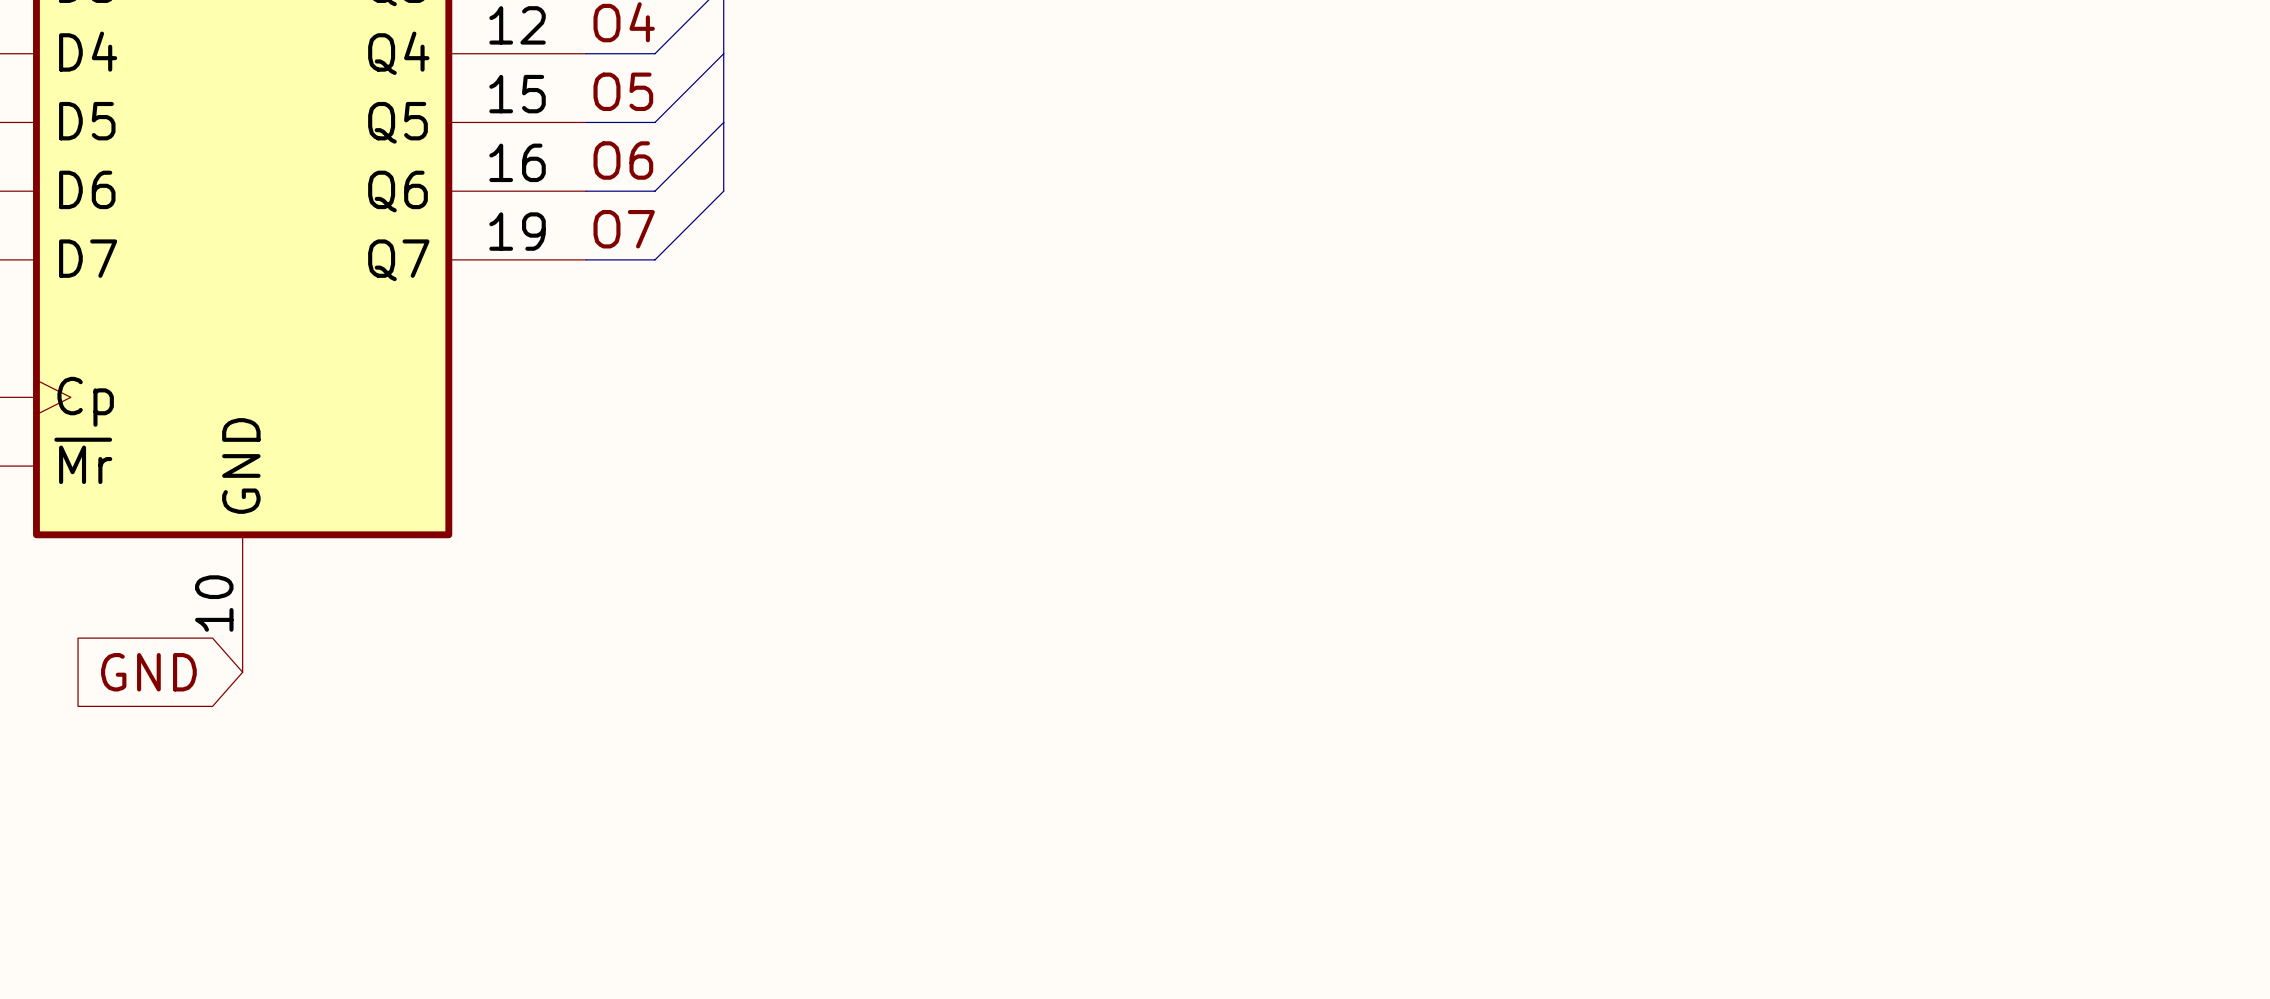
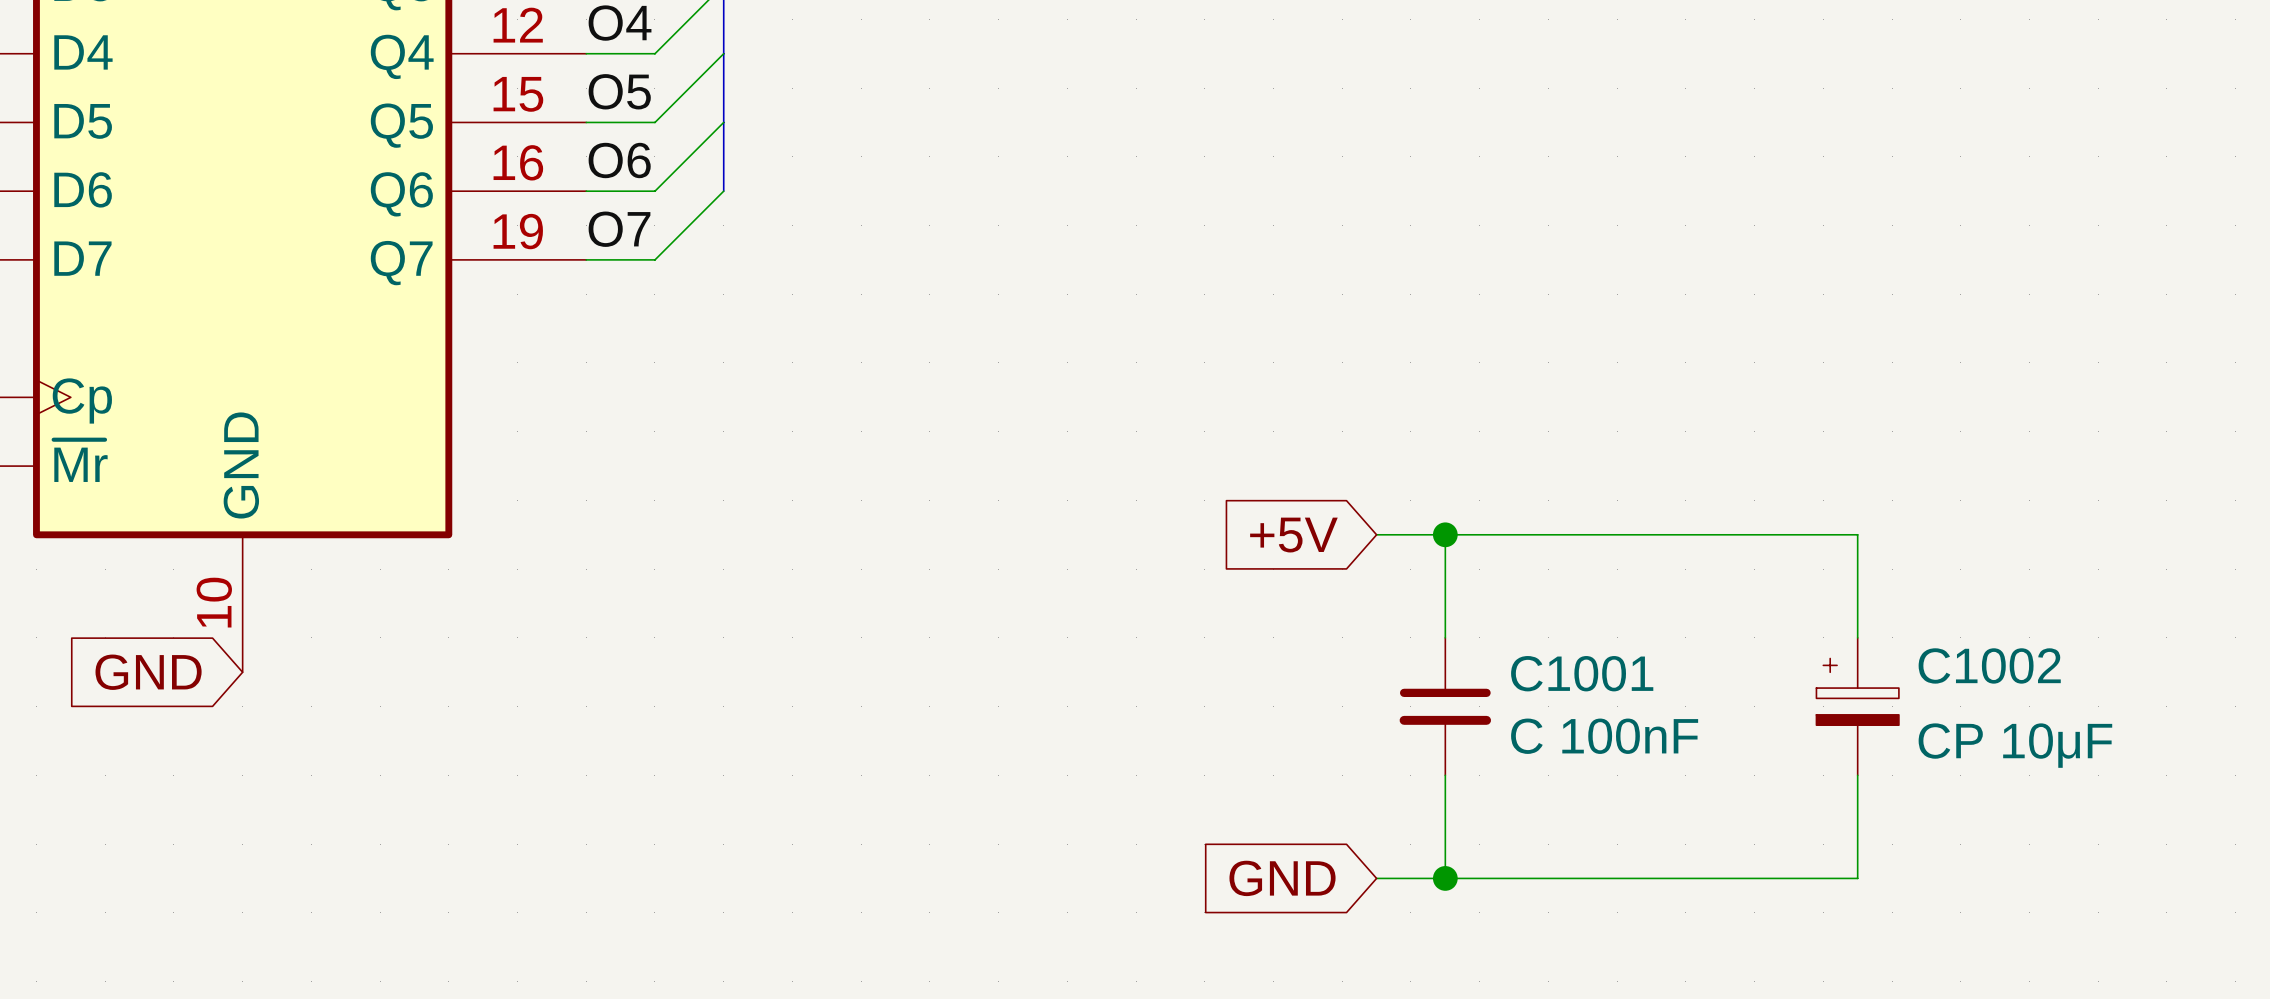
global label: none -> +5V (1293, 535)
wire: none -> (1376, 534) (1857, 534) (1857, 637)
wire: none -> (1445, 534) (1445, 637)
junction: none -> (1445, 534)
C1001: none -> C 100nF (1445, 706)
C1002: none -> CP 10μF (1857, 706)
wire: none -> (1445, 775) (1445, 878)
wire: none -> (1857, 775) (1857, 878) (1376, 878)
global label: none -> GND (1282, 878)
junction: none -> (1445, 878)

